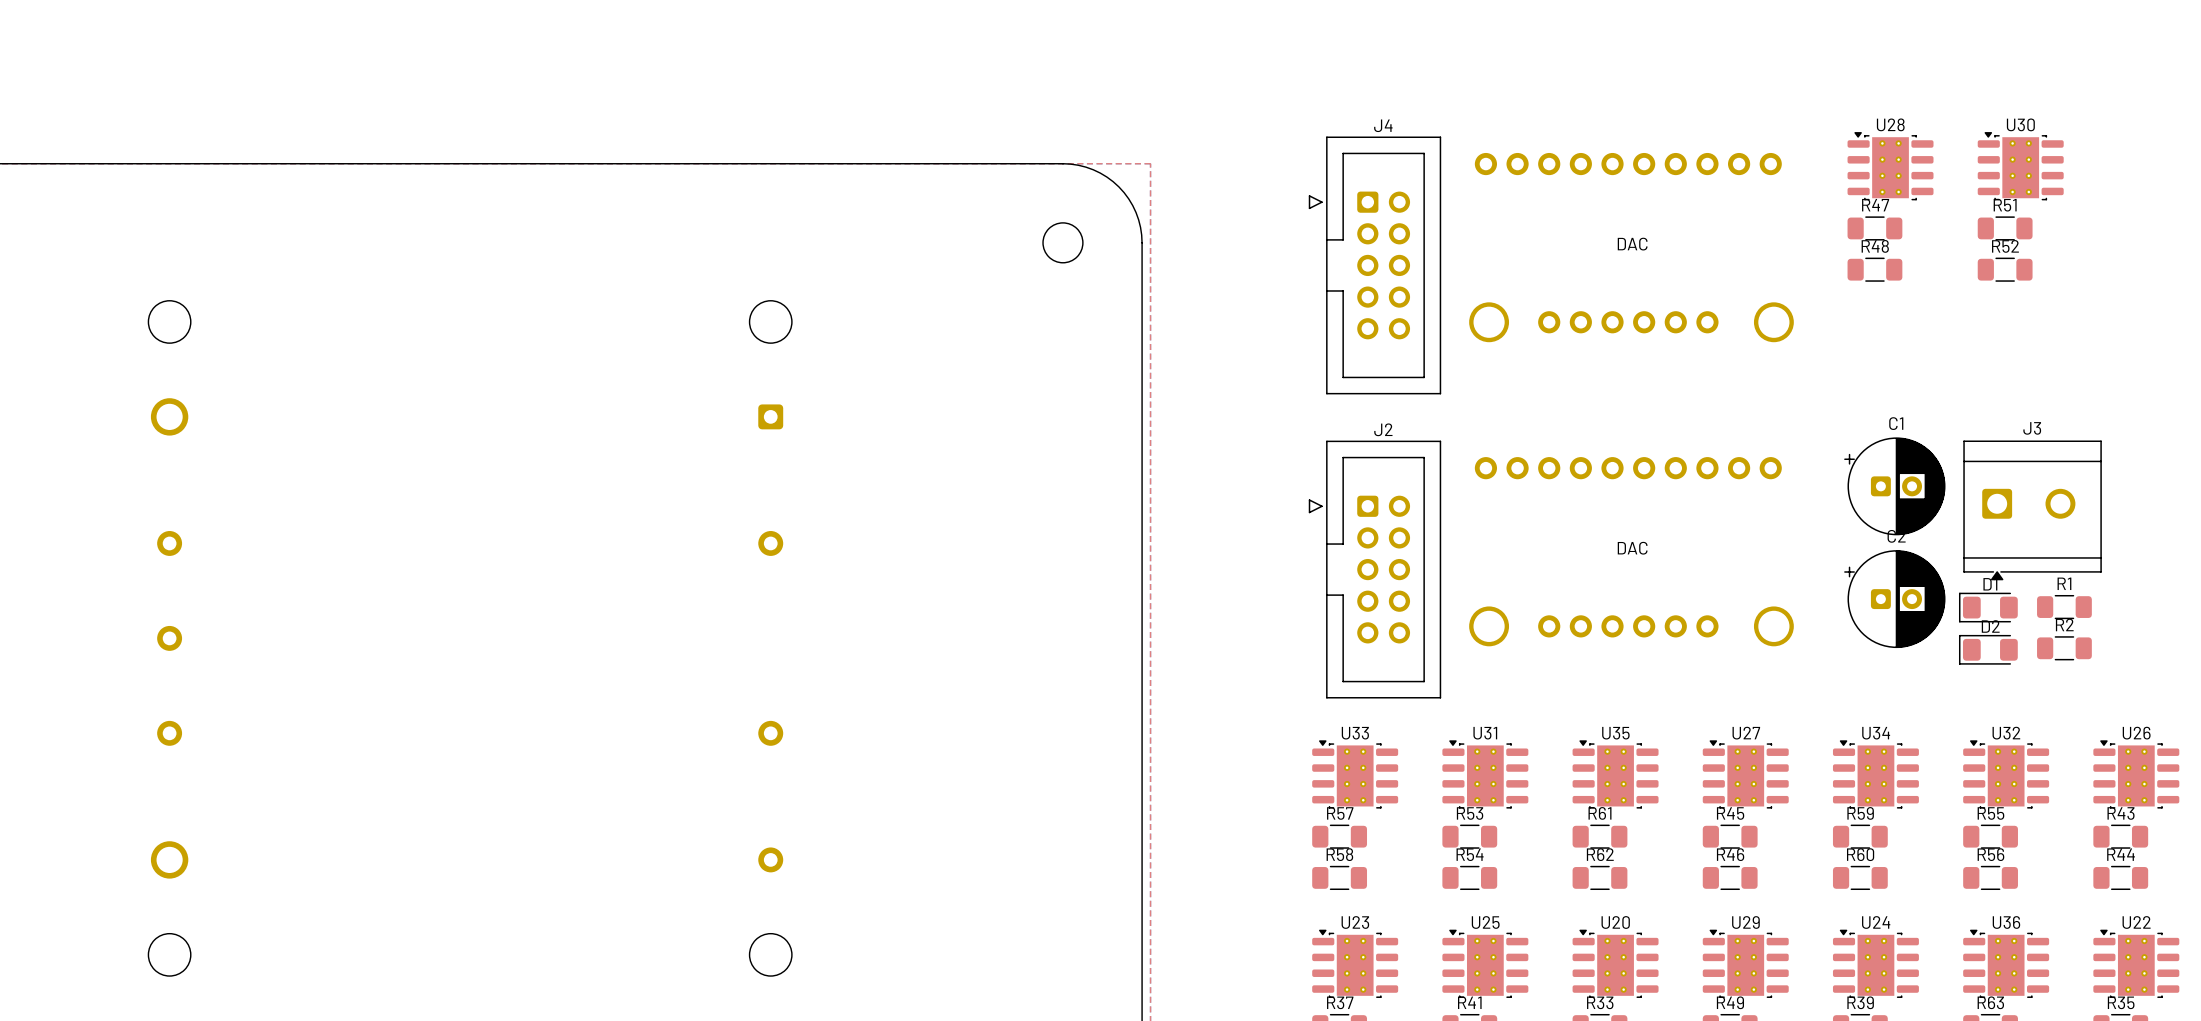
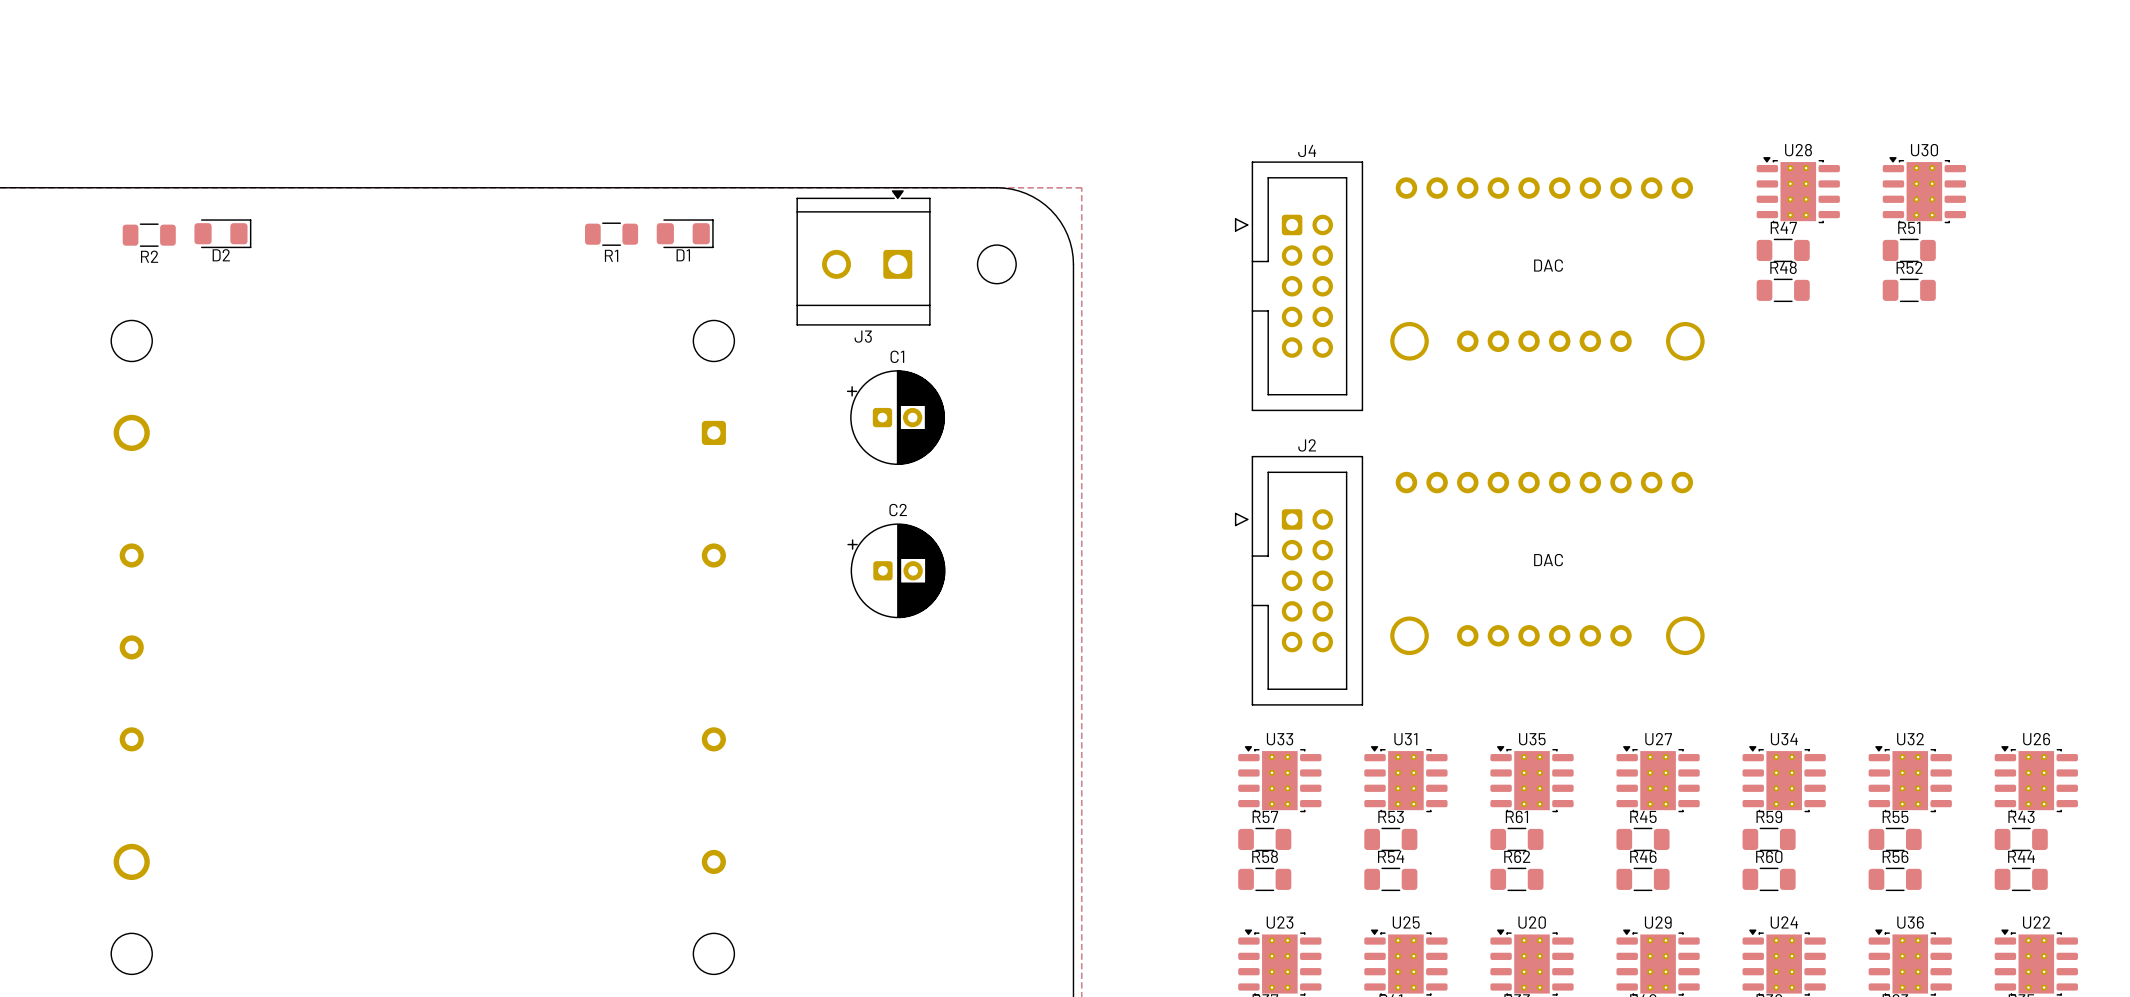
C1 position: (1894, 486) -> (895, 417)
J3 rotation: 0° (2032, 510) -> 180° (863, 257)
J3 position: (2032, 510) -> (863, 257)
R1 name position: R1 (2064, 583) -> R1 (611, 255)
C2 position: (1894, 599) -> (896, 570)
D1 rotation: 0° (1988, 607) -> 180° (685, 233)
D1 position: (1988, 607) -> (685, 233)
R1 position: (2064, 607) -> (611, 234)
R2 name position: R2 (2064, 624) -> R2 (149, 256)
R2 position: (2064, 648) -> (149, 235)
D2 rotation: 0° (1988, 649) -> 180° (222, 233)
D2 position: (1988, 649) -> (222, 233)

